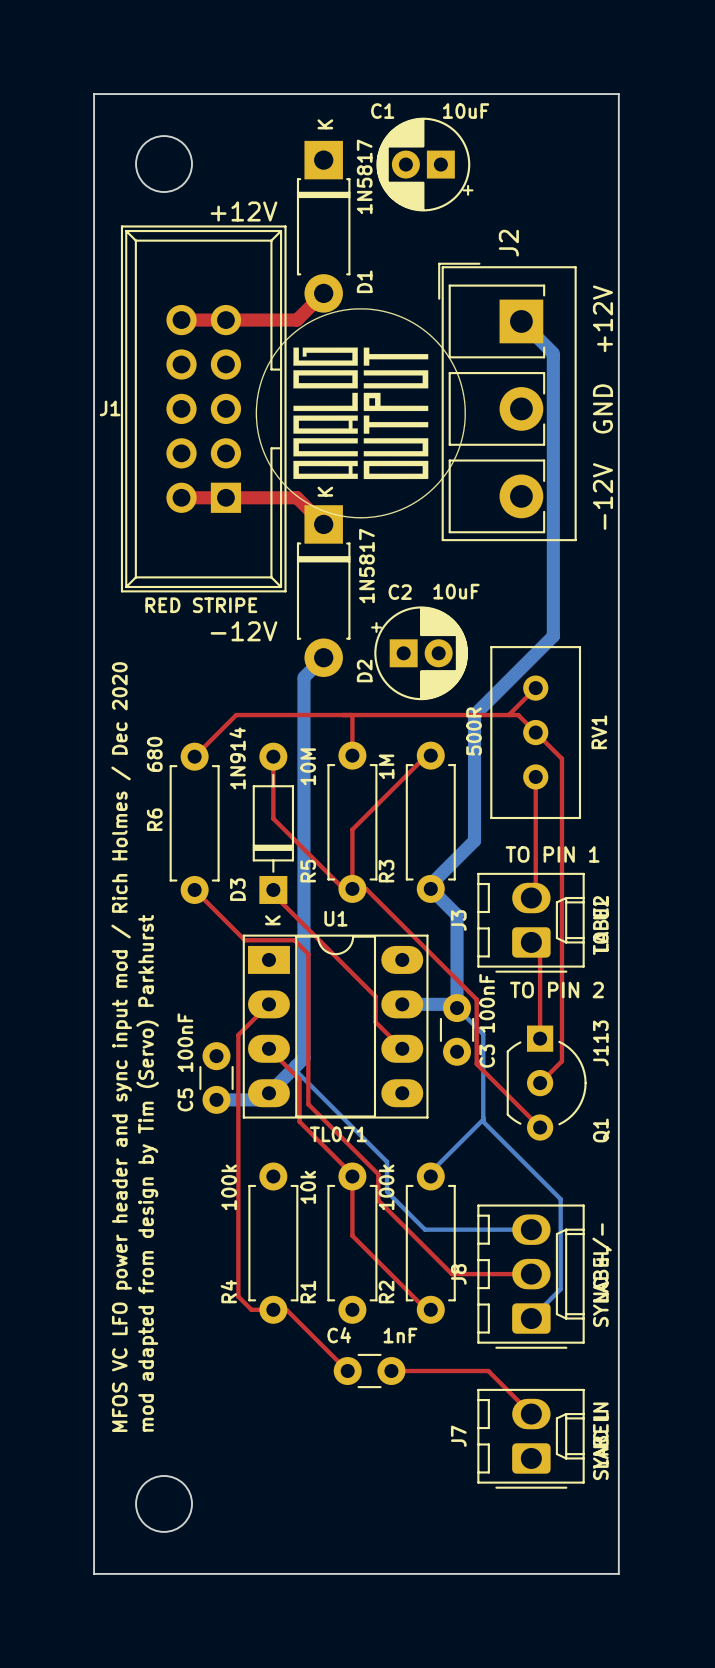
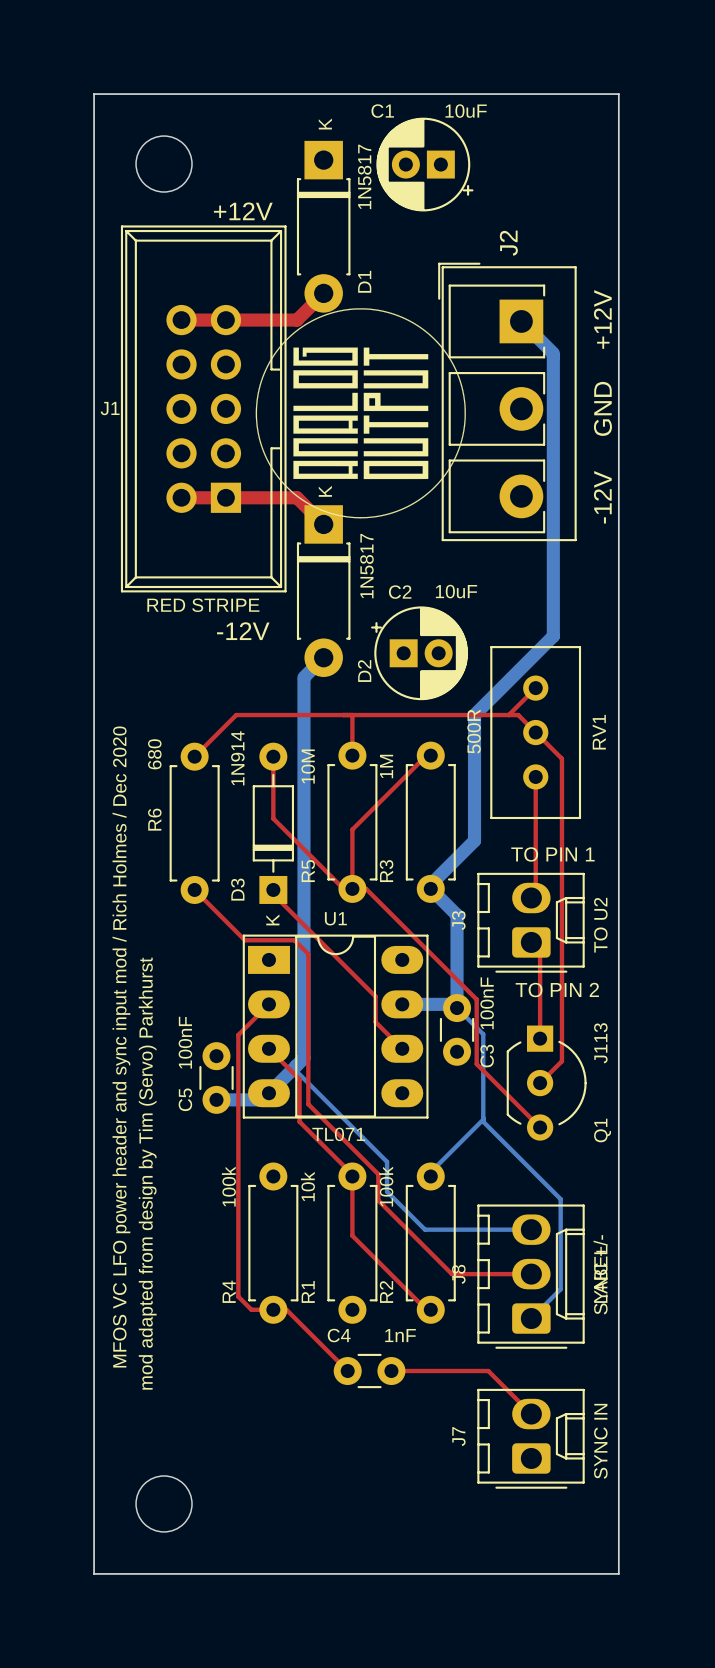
J3 footprint: [477, 872, 585, 973] -> [477, 872, 585, 973]
J7 footprint: [477, 1388, 585, 1489] -> [477, 1388, 585, 1489]

